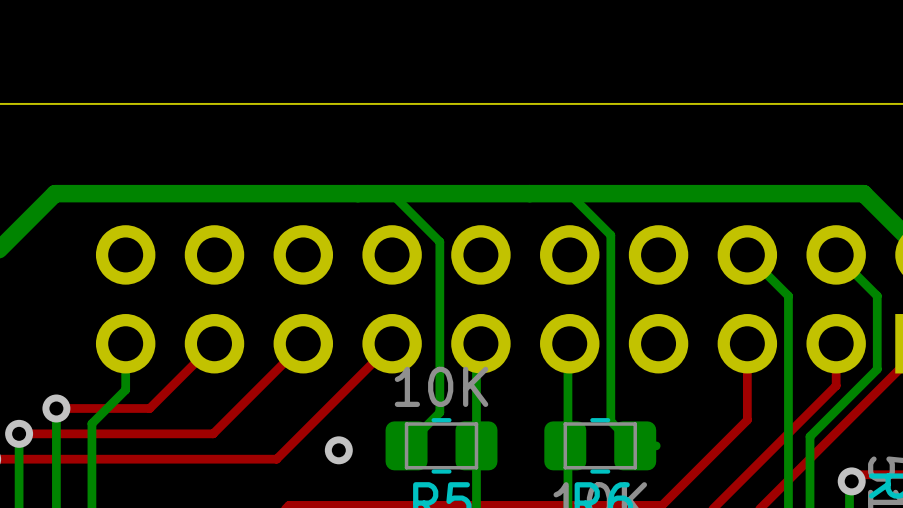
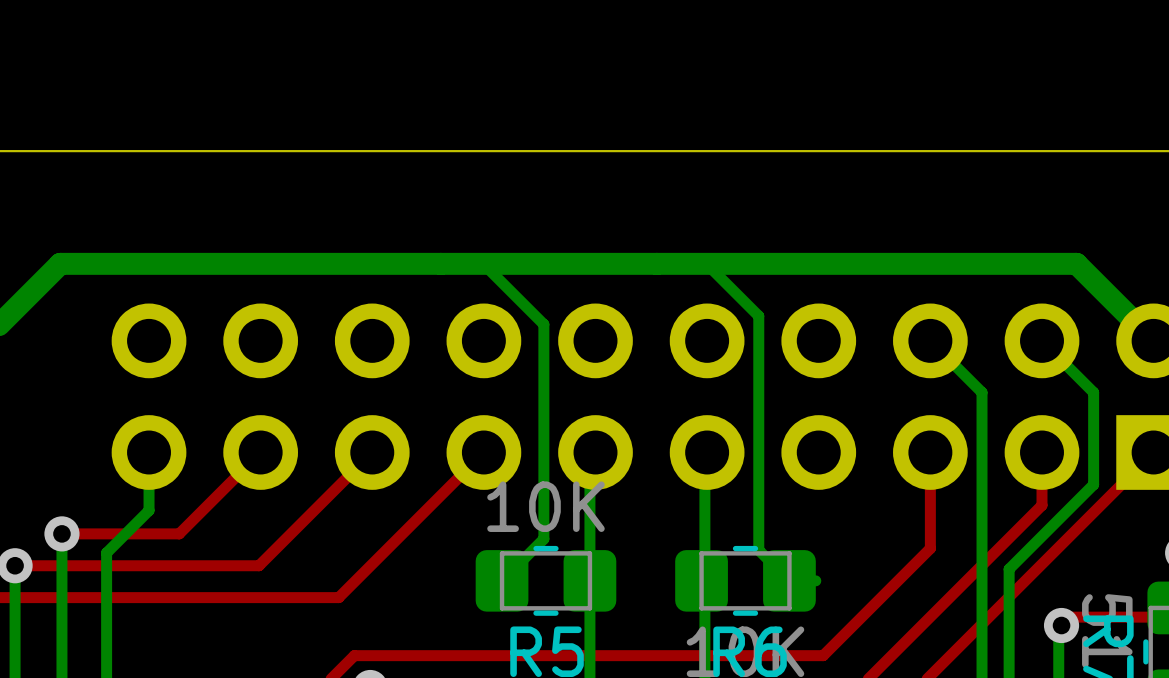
via: (338, 450) -> none

